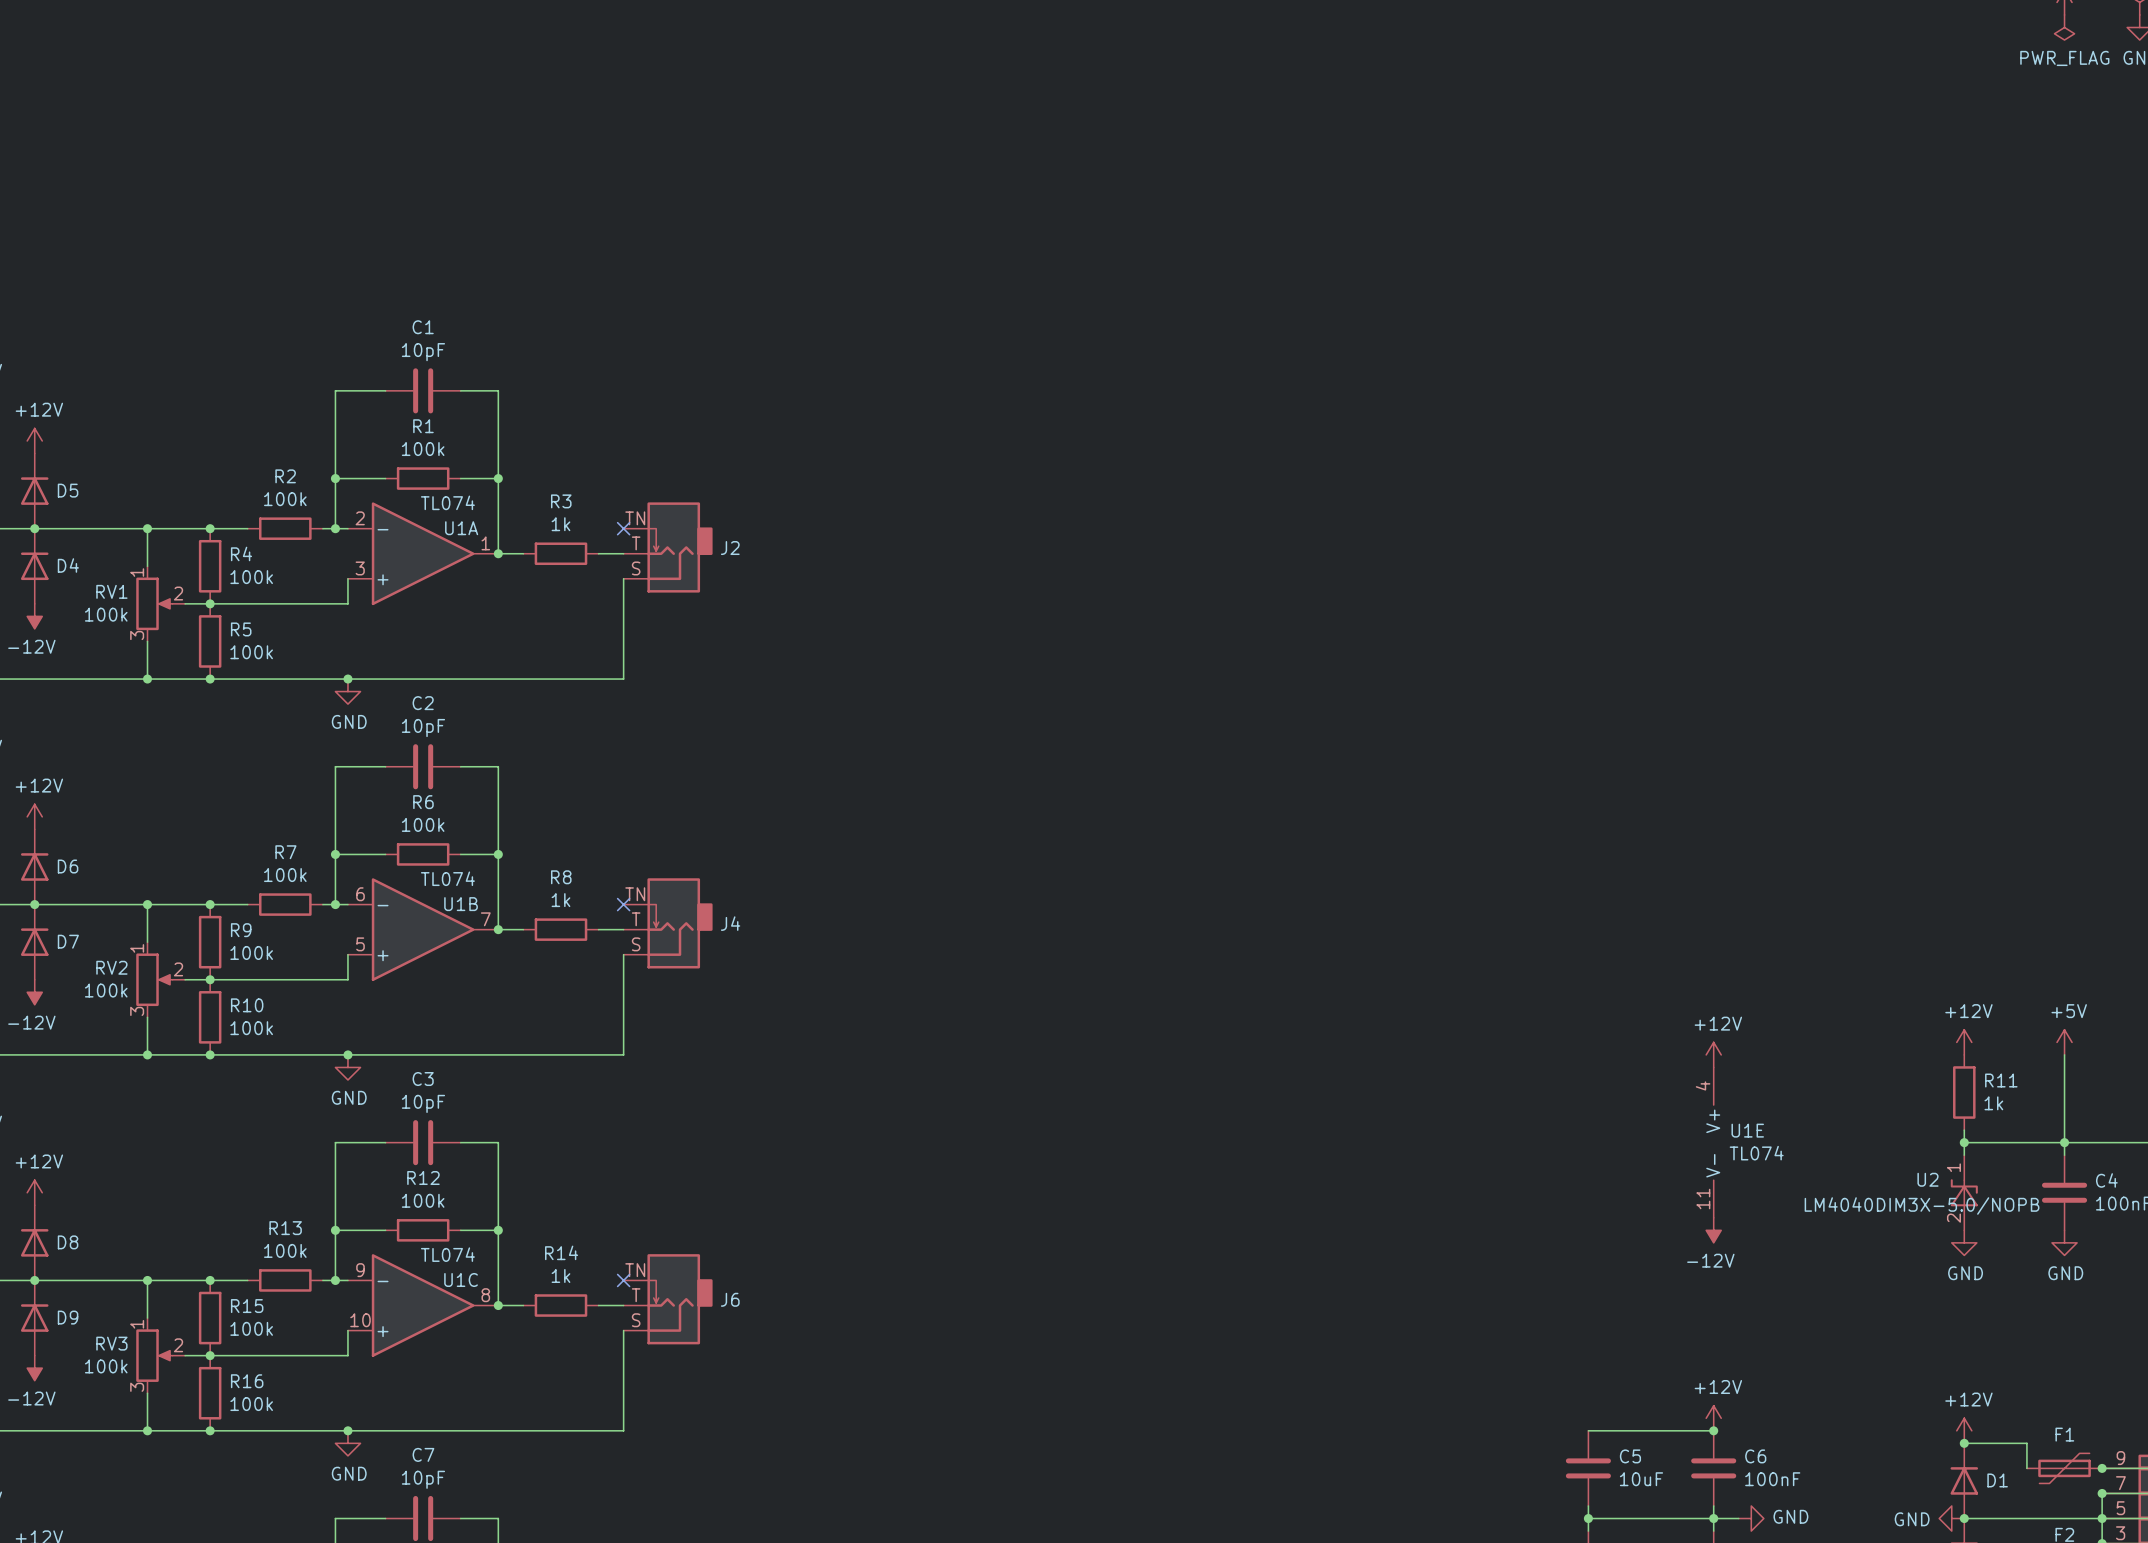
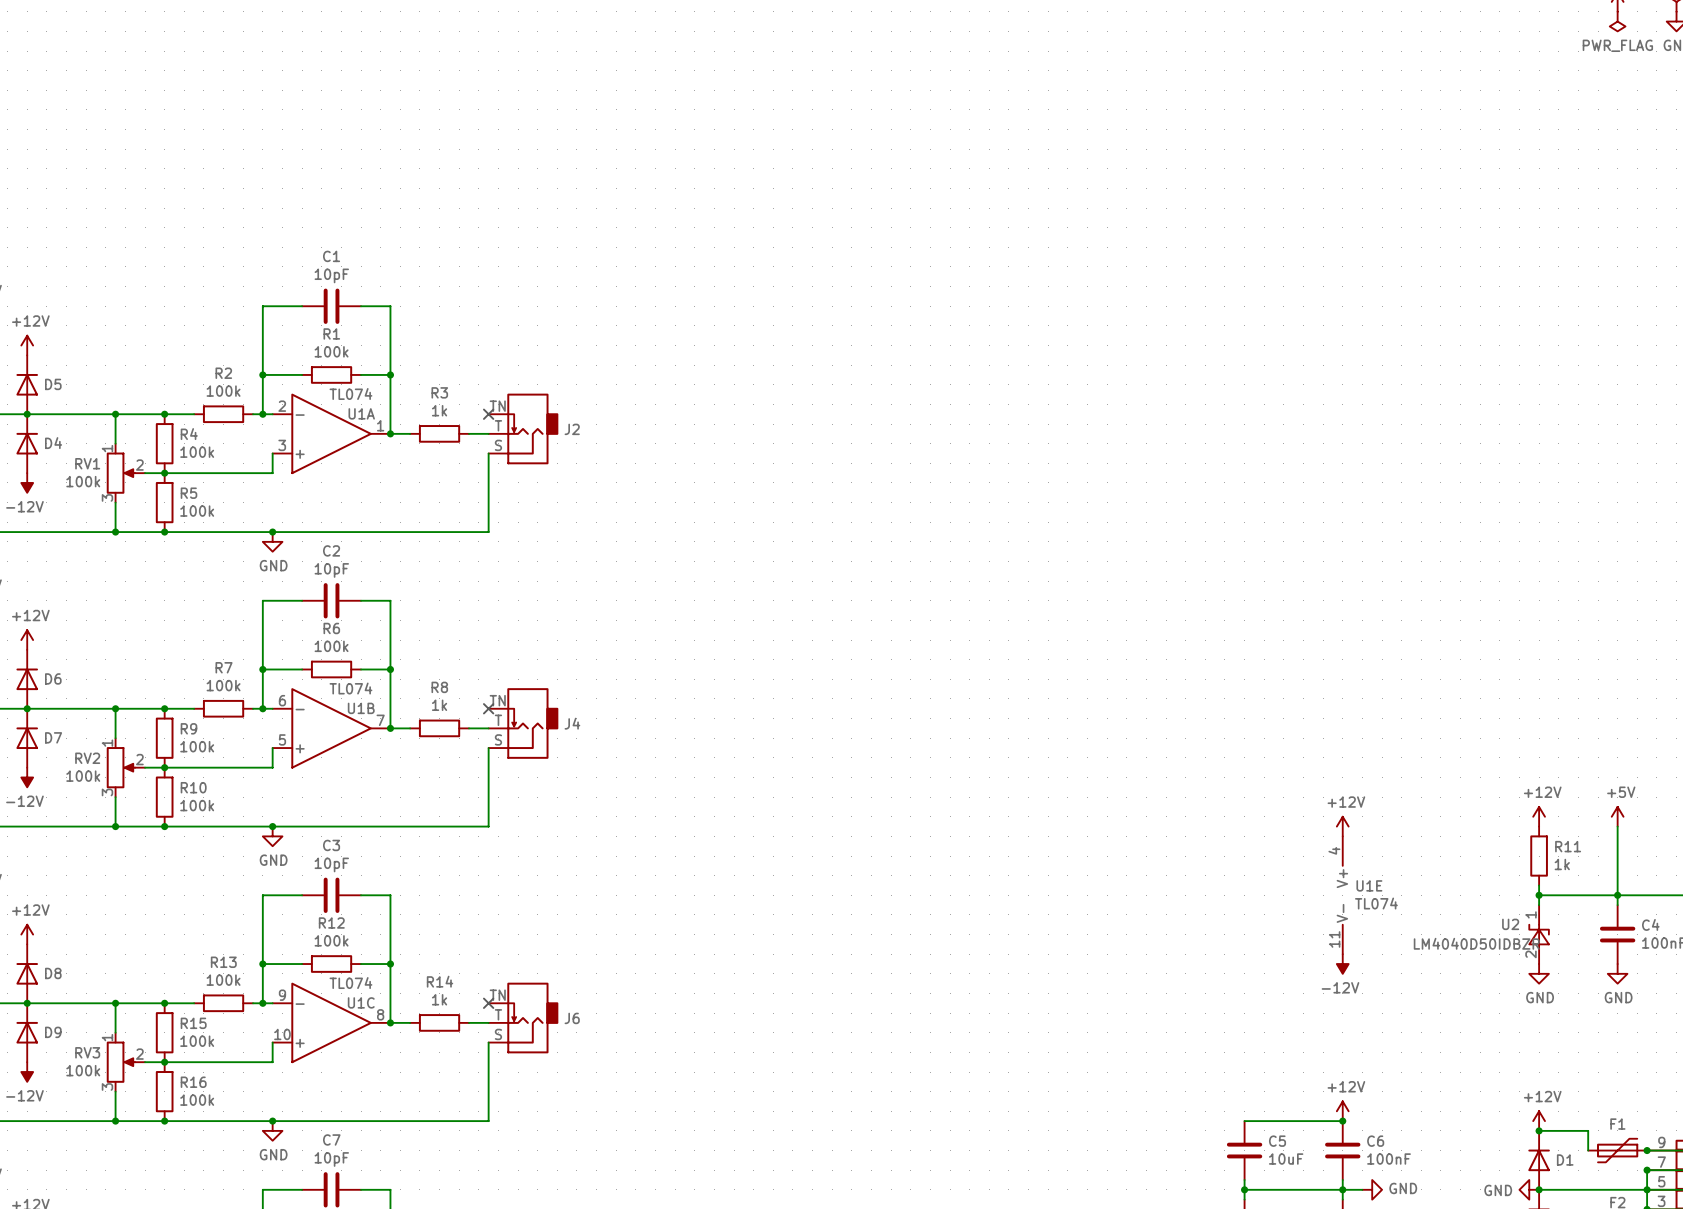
U2 value: LM4040DIM3X-5.0/NOPB (1922, 1206) -> LM4040D50IDBZR (1476, 943)

